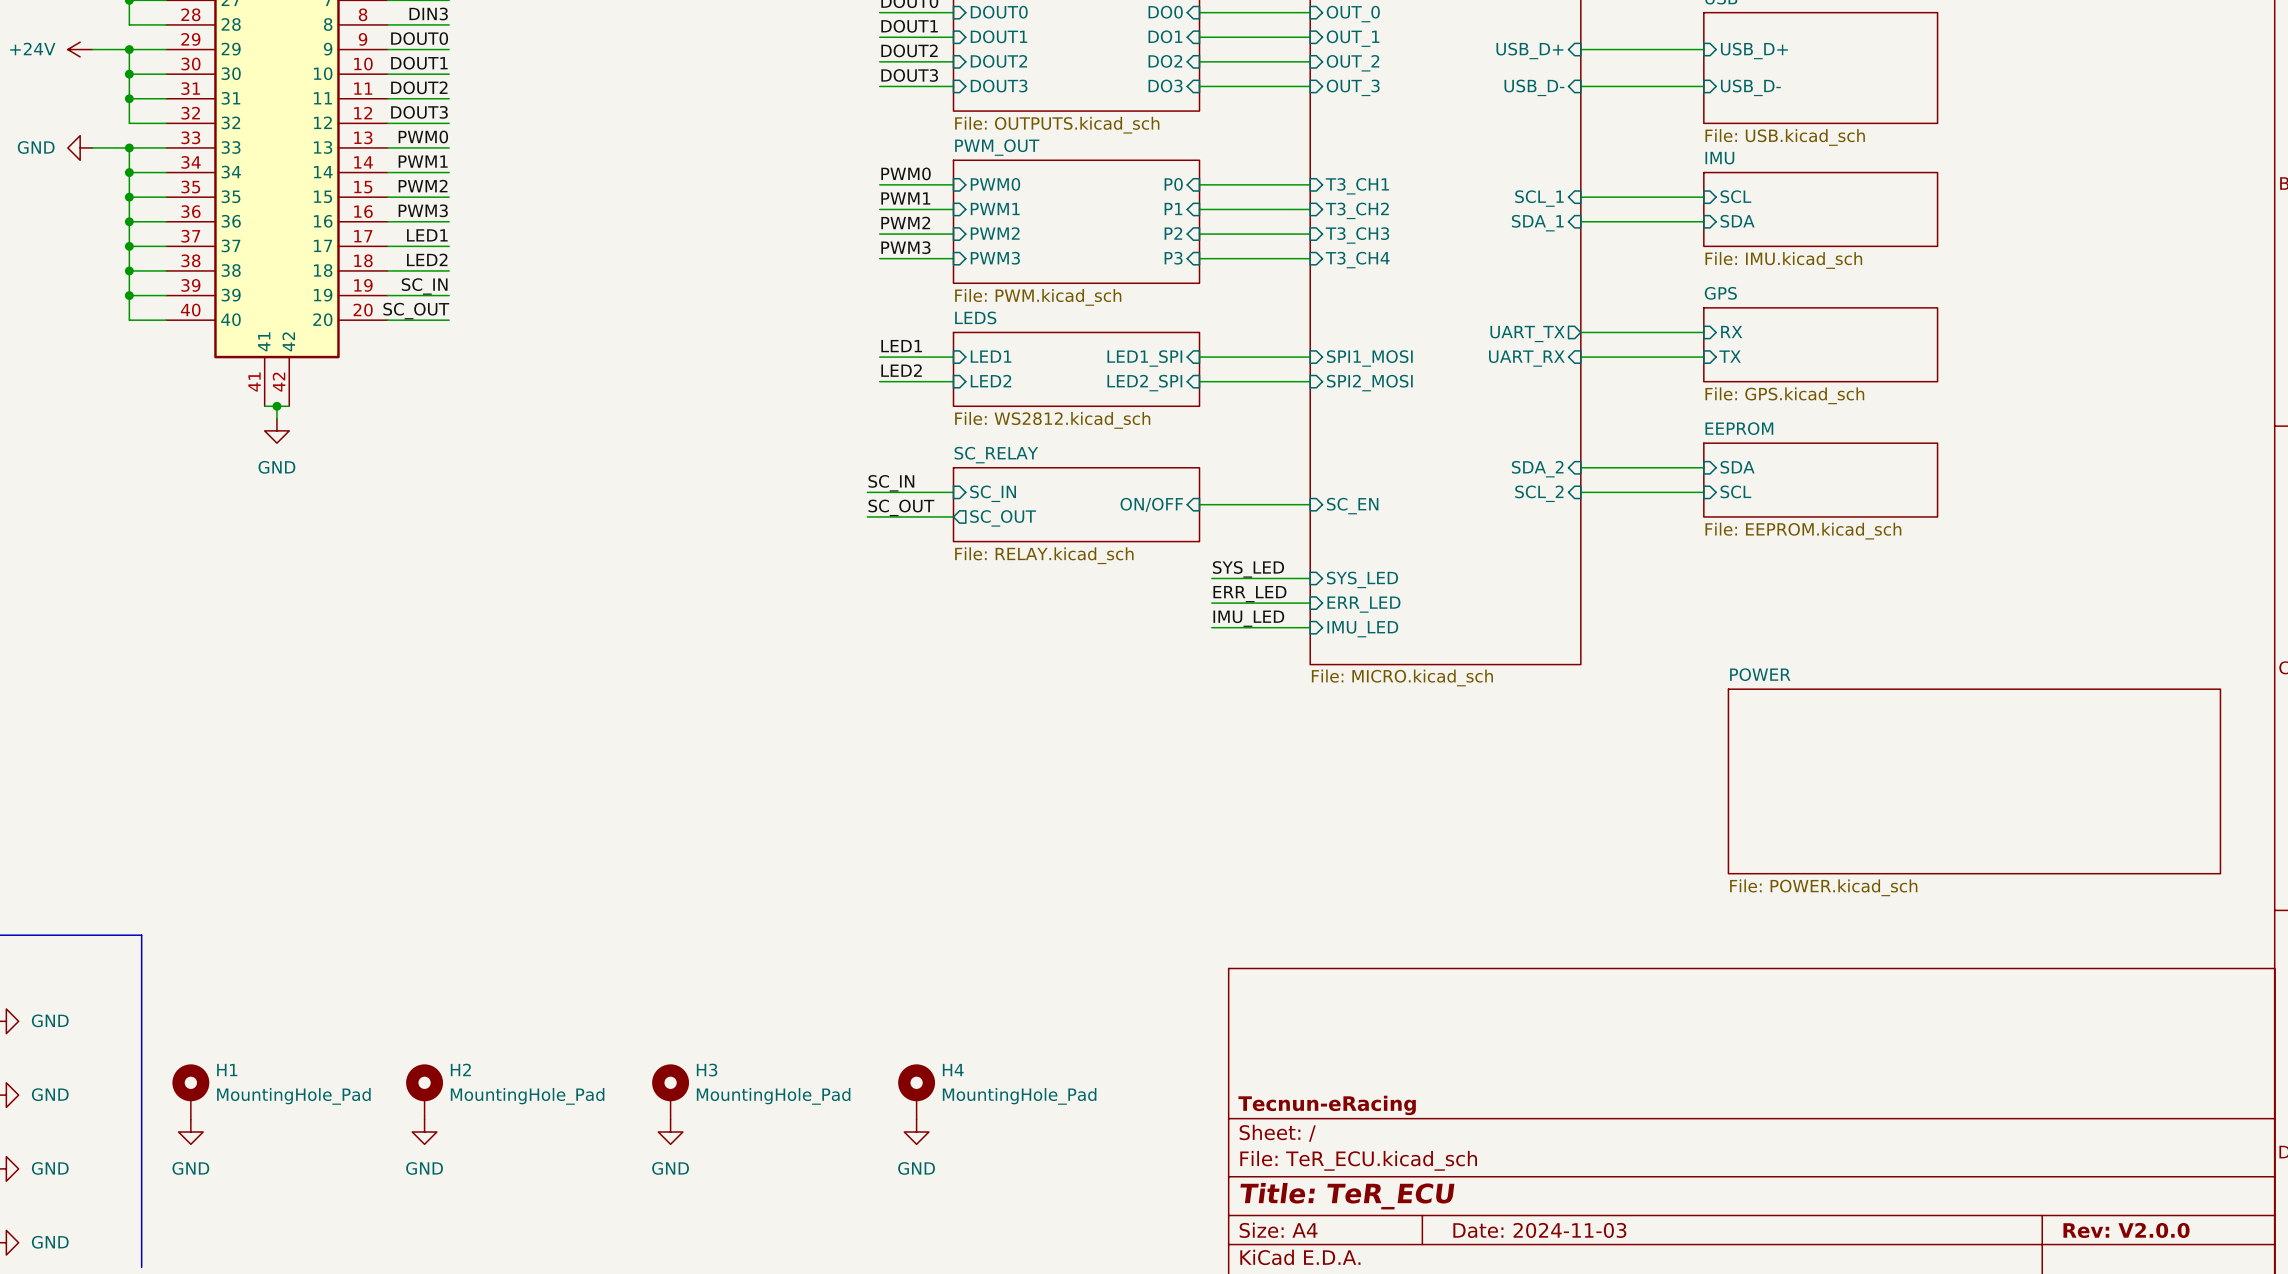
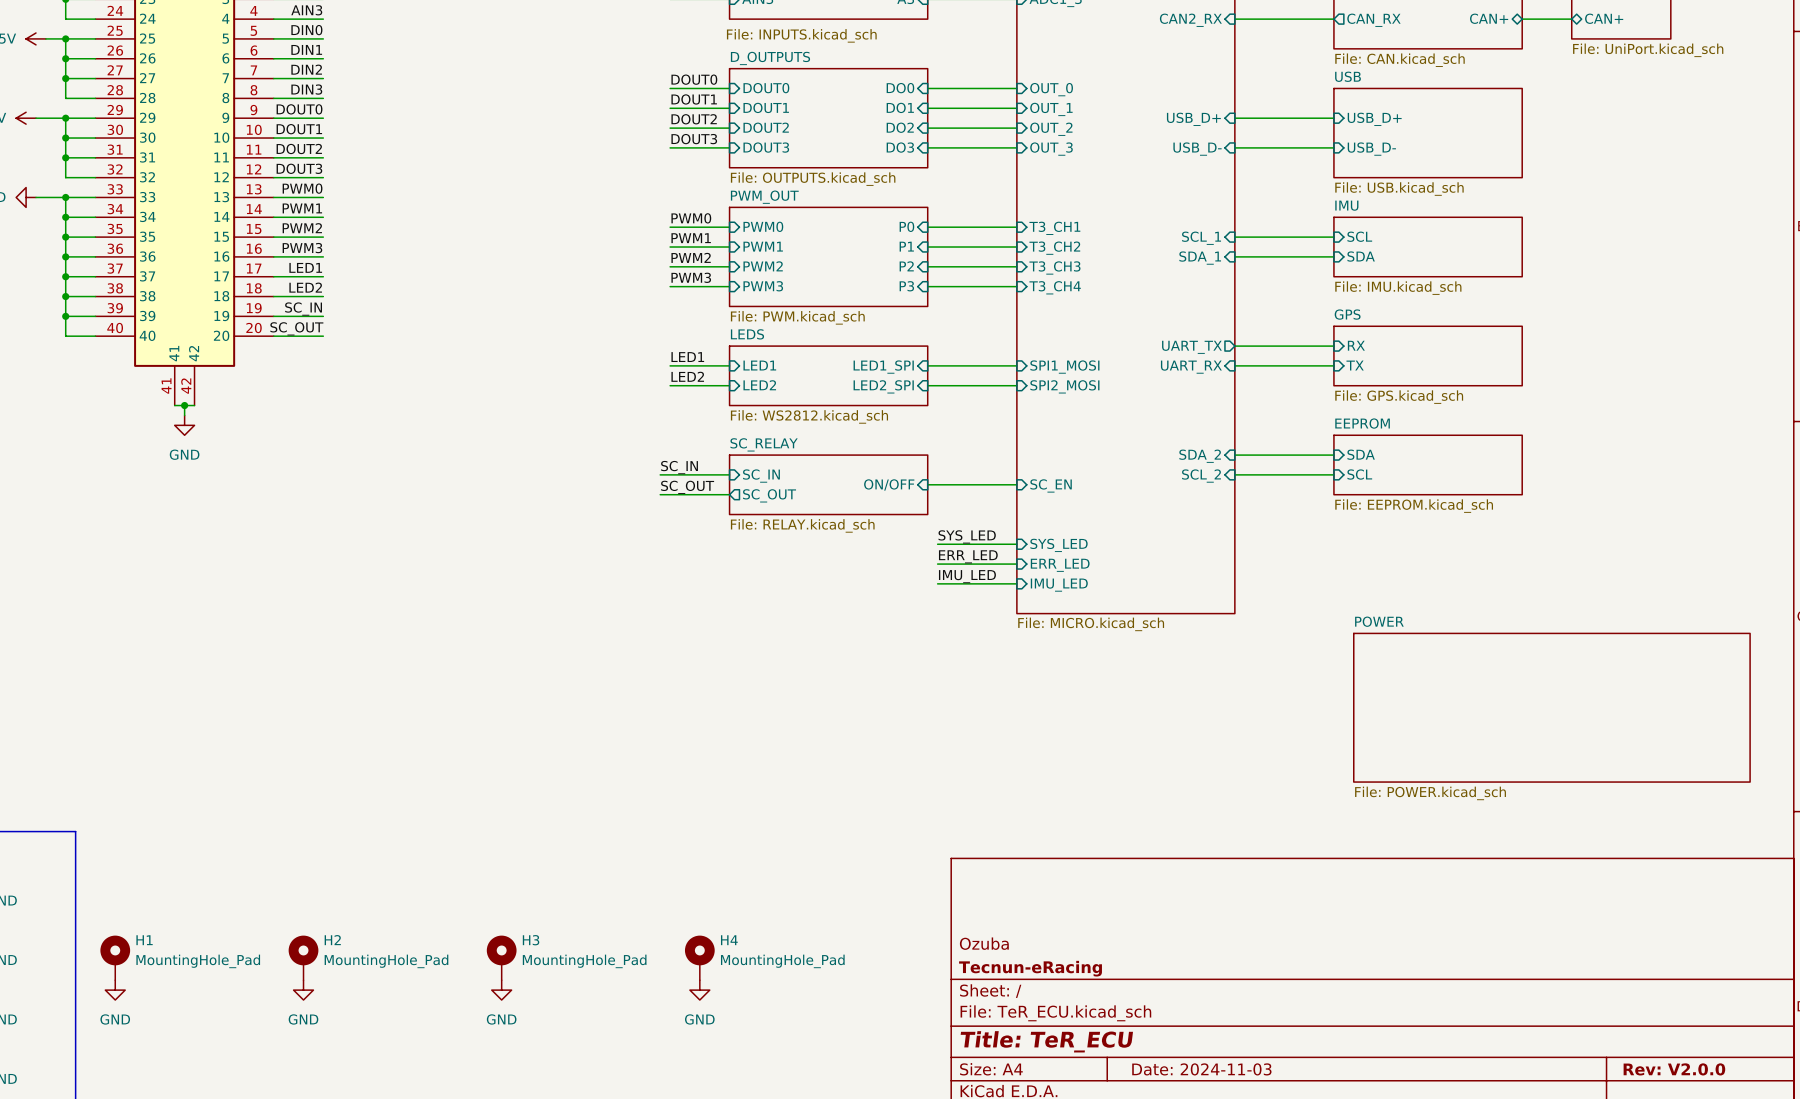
title block: none -> Ozuba (984, 943)

